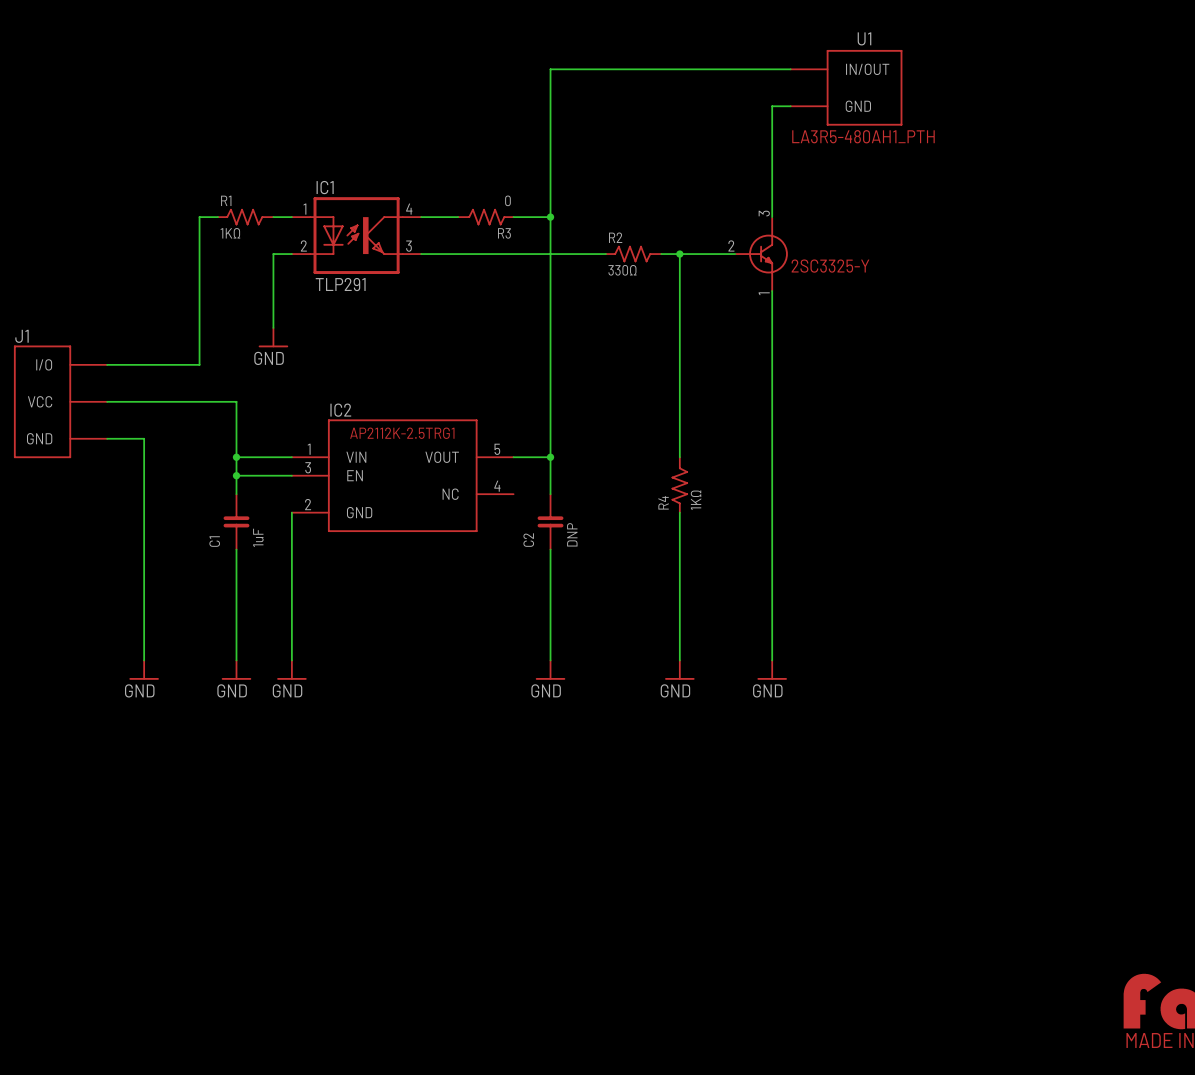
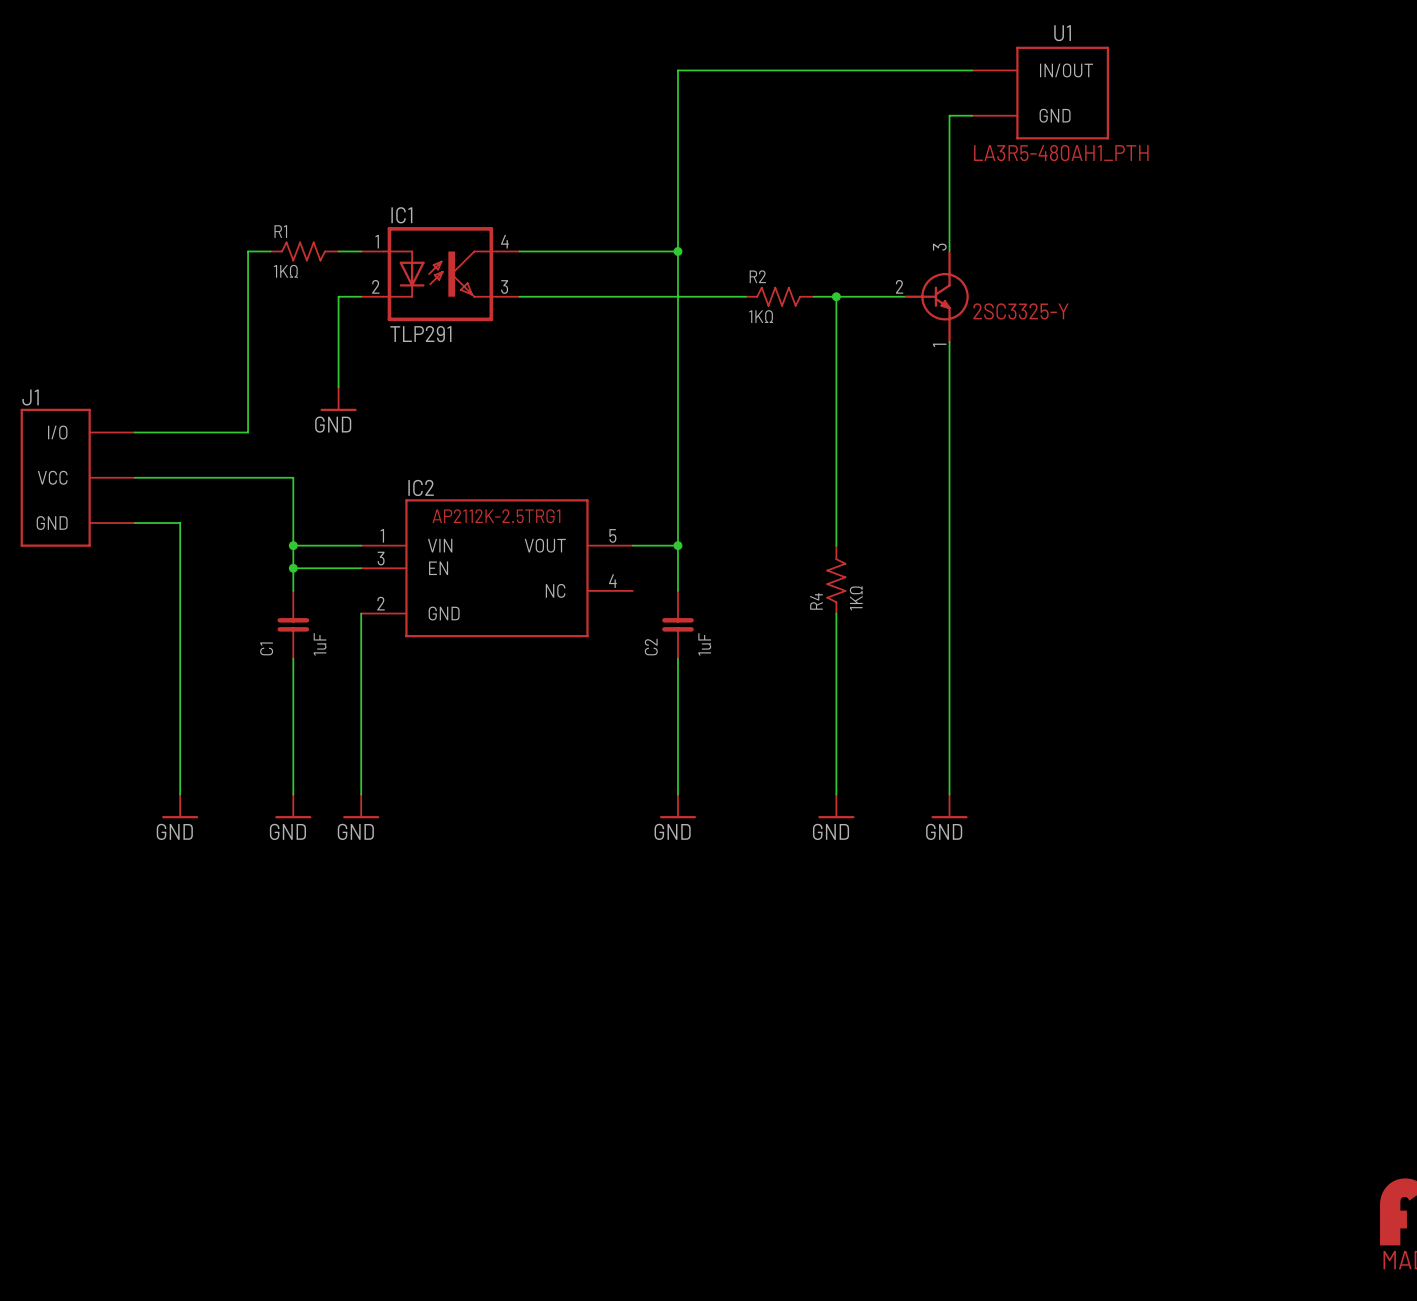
R3: 0 (485, 217) -> none
R2 value: 330Ω (622, 270) -> 1KΩ (761, 316)
C2 value: DNP (572, 534) -> 1uF (704, 644)

